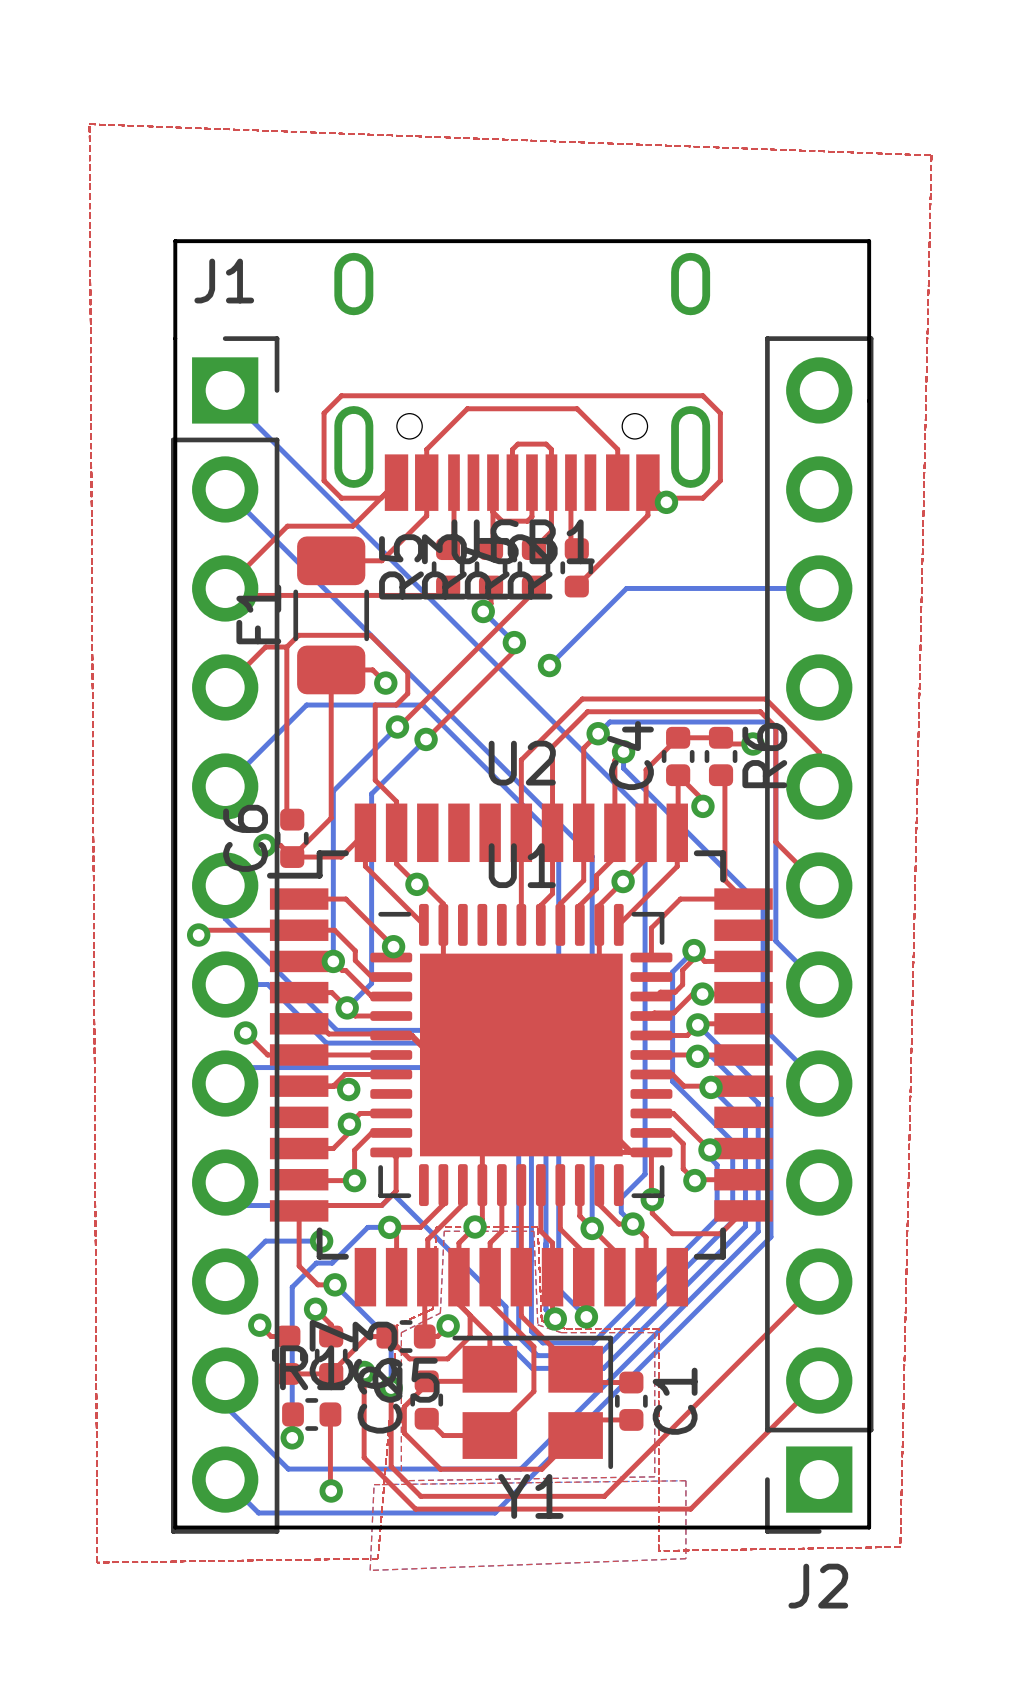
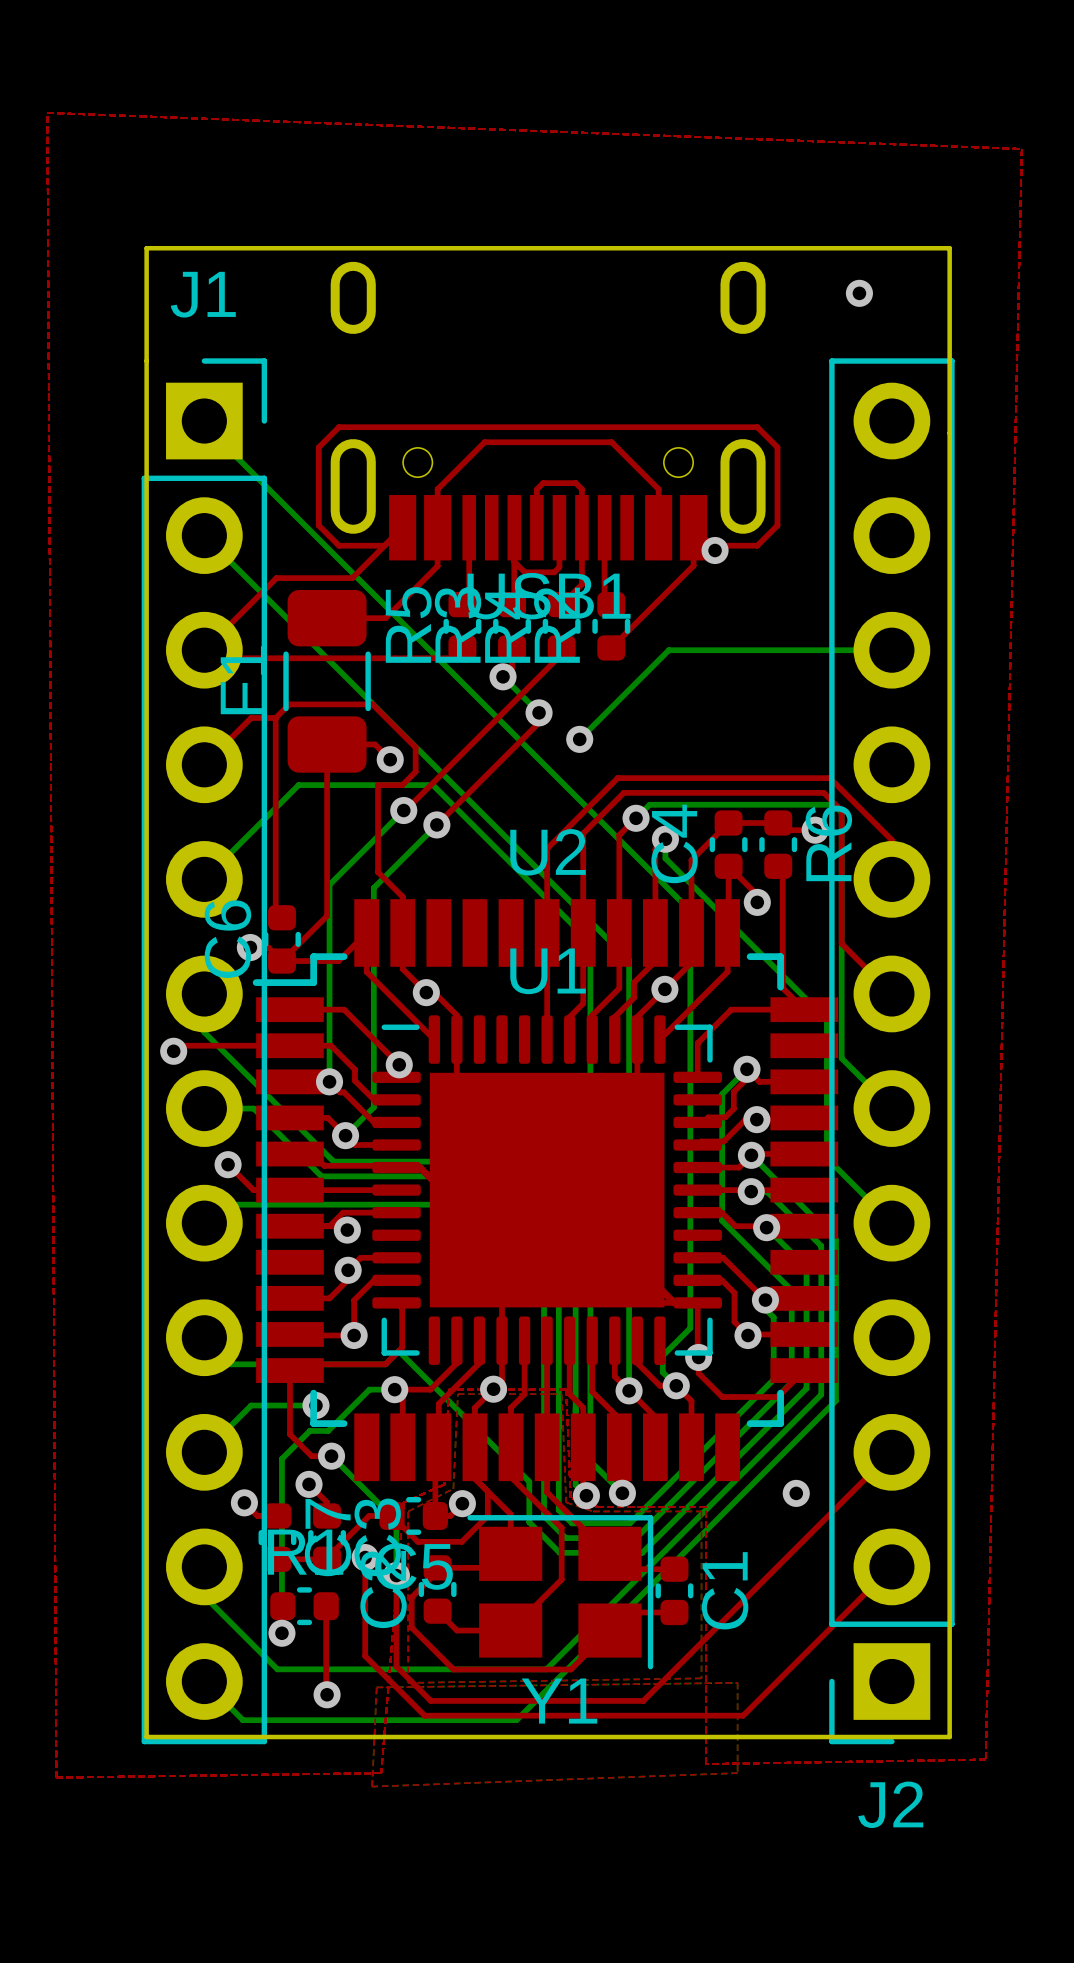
via: none -> (859, 293)
via: none -> (796, 1493)

